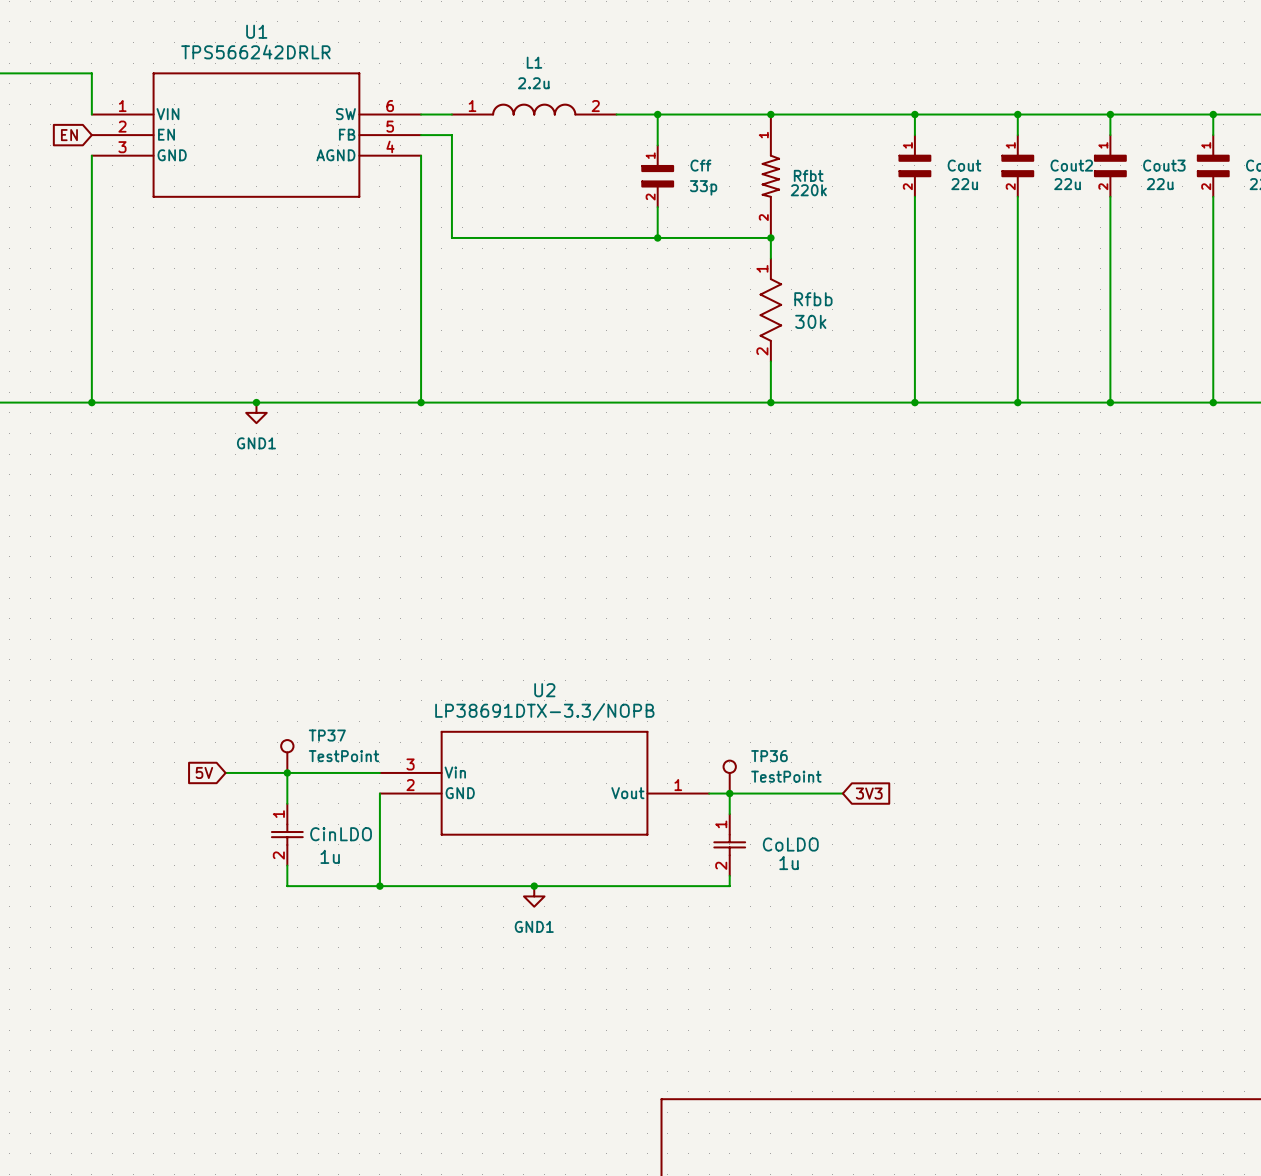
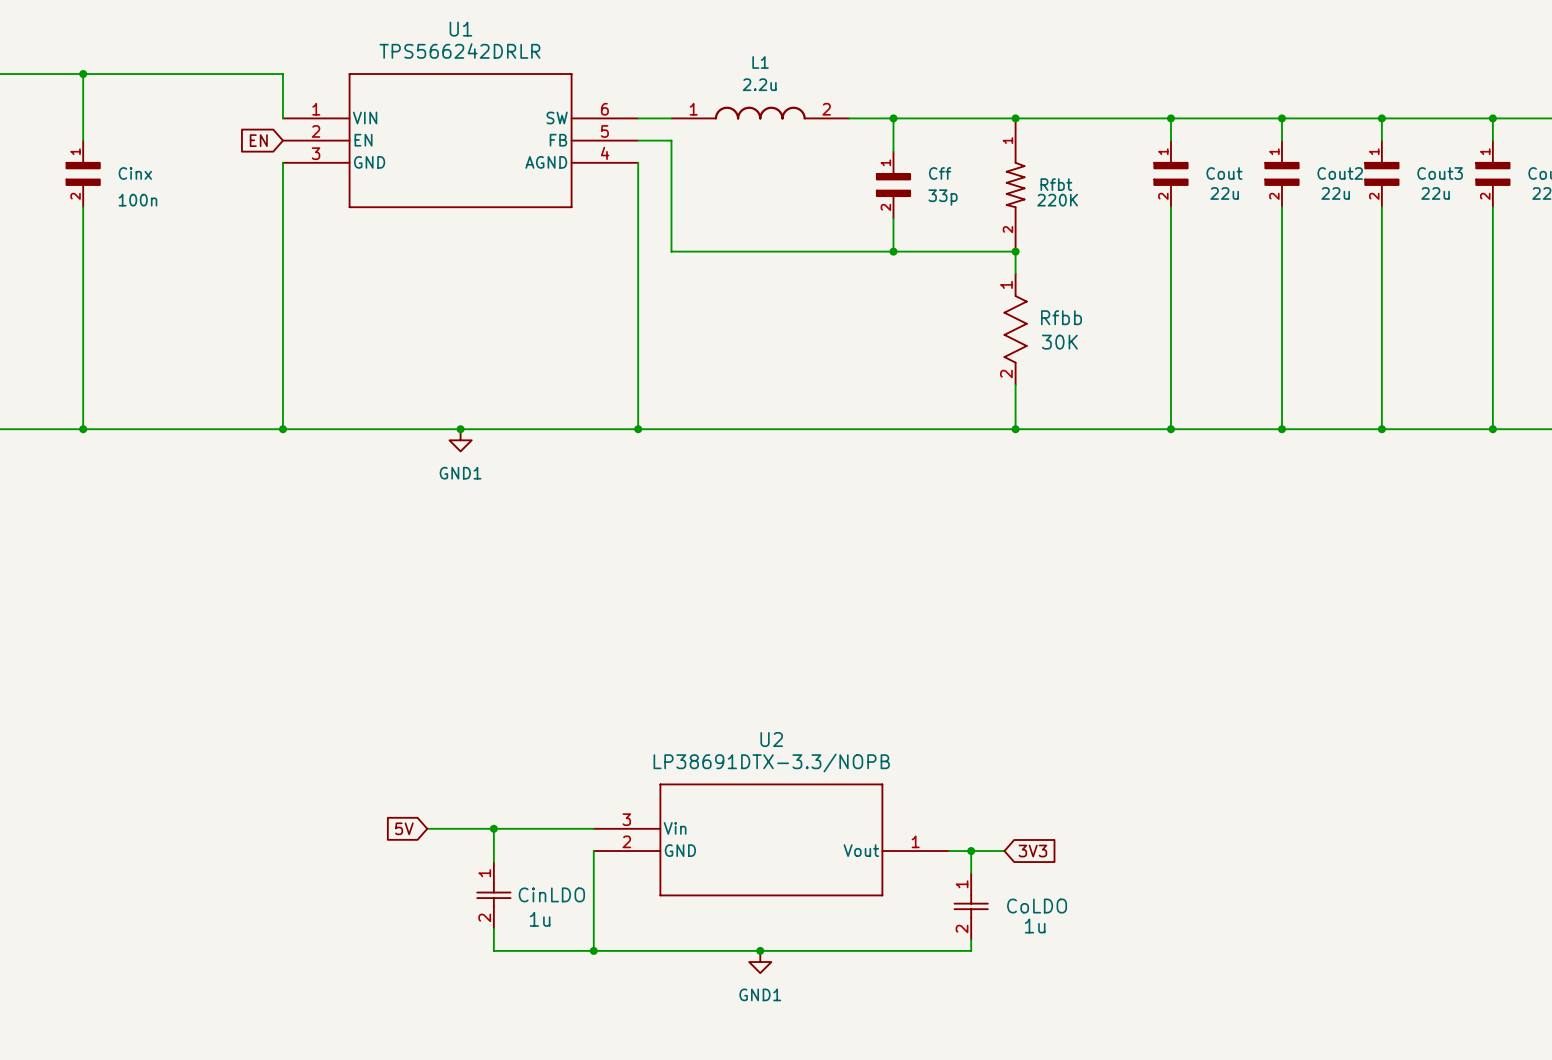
Rfbt value: 220k (808, 190) -> 220K (1057, 200)
Rfbb value: 30k (810, 321) -> 30K (1059, 342)
TP37: TestPoint (287, 756) -> none
TP36: TestPoint (729, 777) -> none
wire: (760, 793) (842, 793) -> none
global label position: 3V3 (869, 793) -> 3V3 (1032, 851)

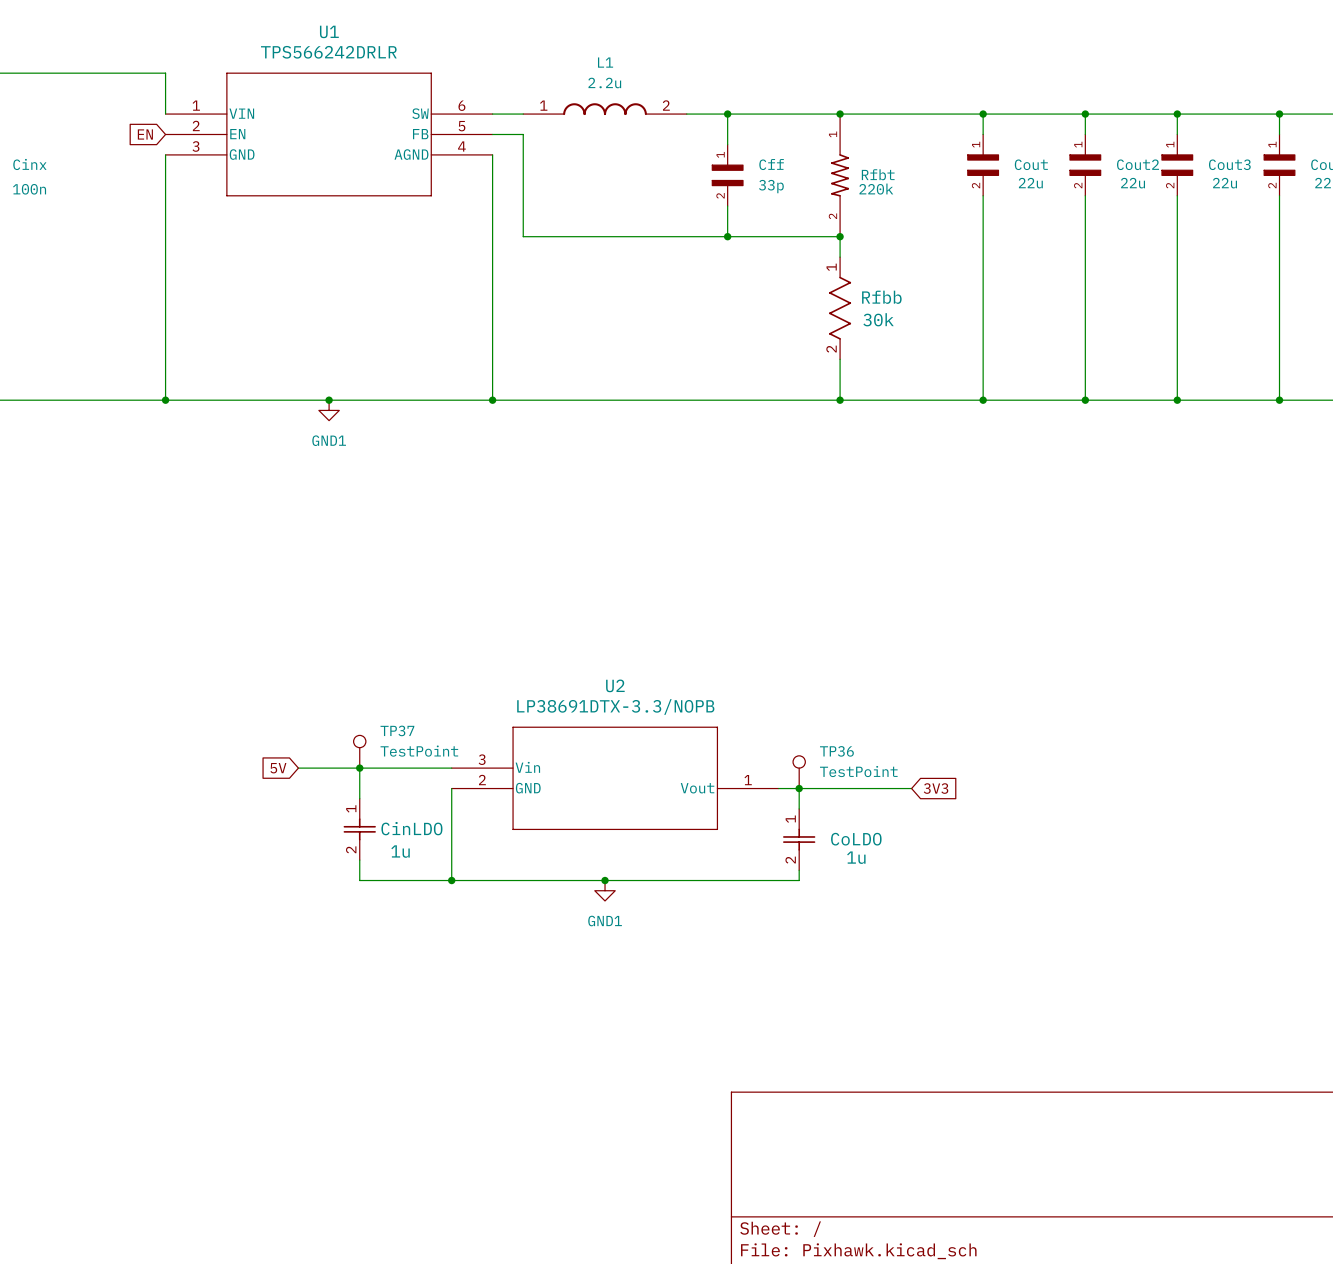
Rfbt value: 220K (1057, 200) -> 220k (876, 189)
Rfbb value: 30K (1059, 342) -> 30k (878, 319)
TP37: none -> TestPoint (359, 751)
TP36: none -> TestPoint (799, 772)
wire: none -> (829, 788) (911, 788)
global label position: 3V3 (1032, 851) -> 3V3 (936, 788)

